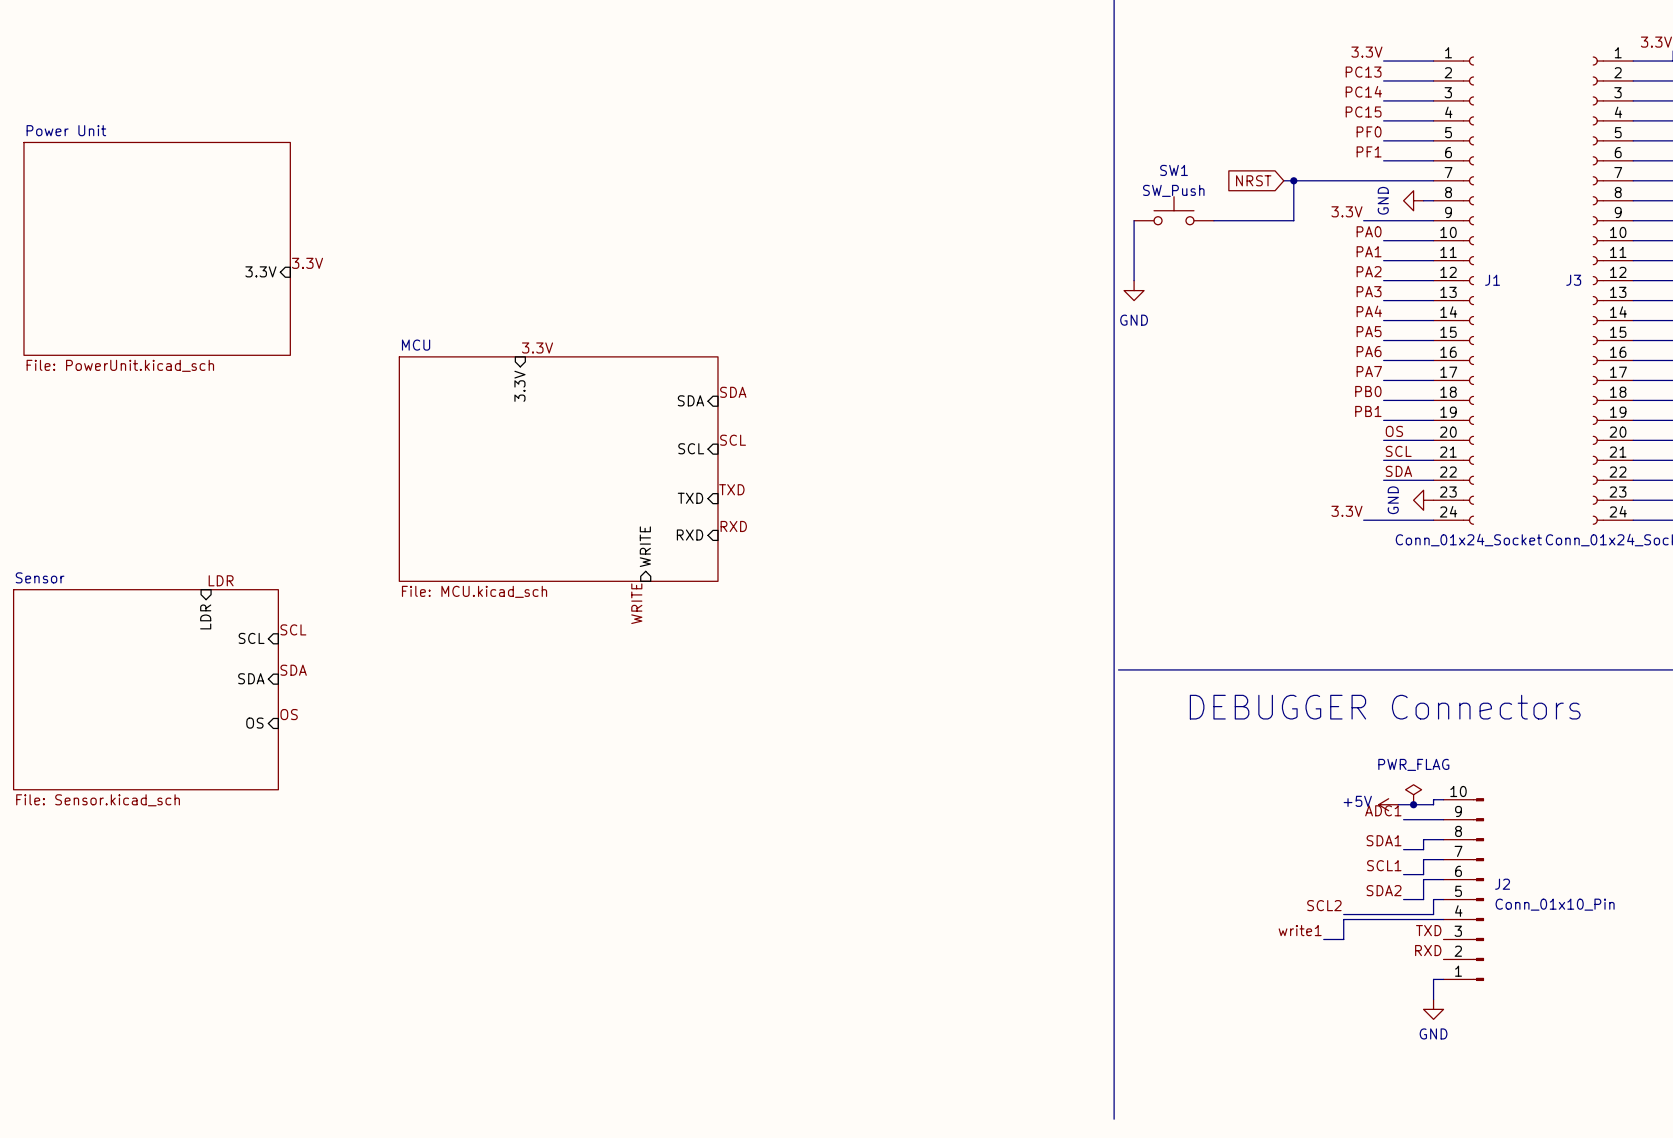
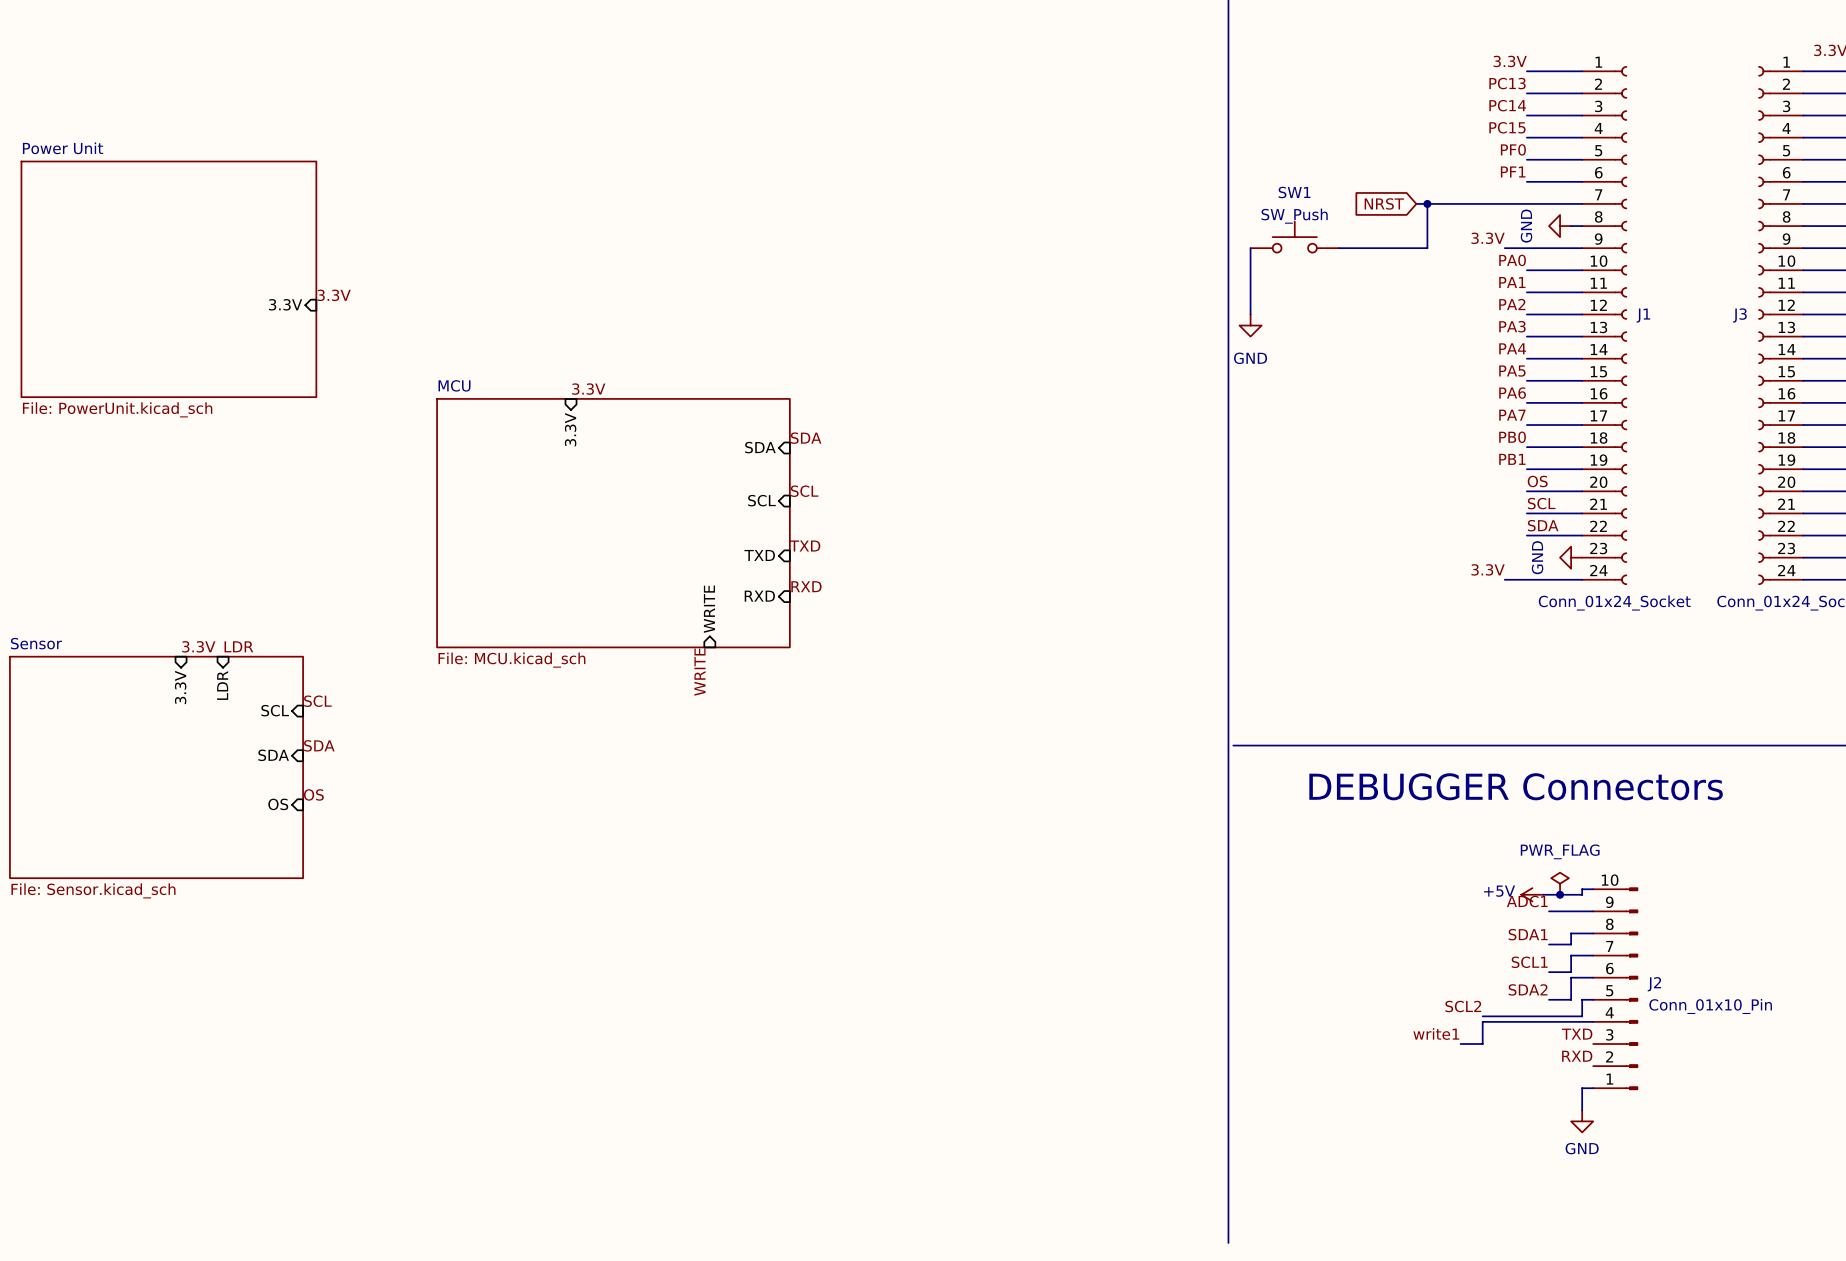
label: none -> 3.3V (198, 646)
sheet pin: none -> 3.3V (180, 687)

